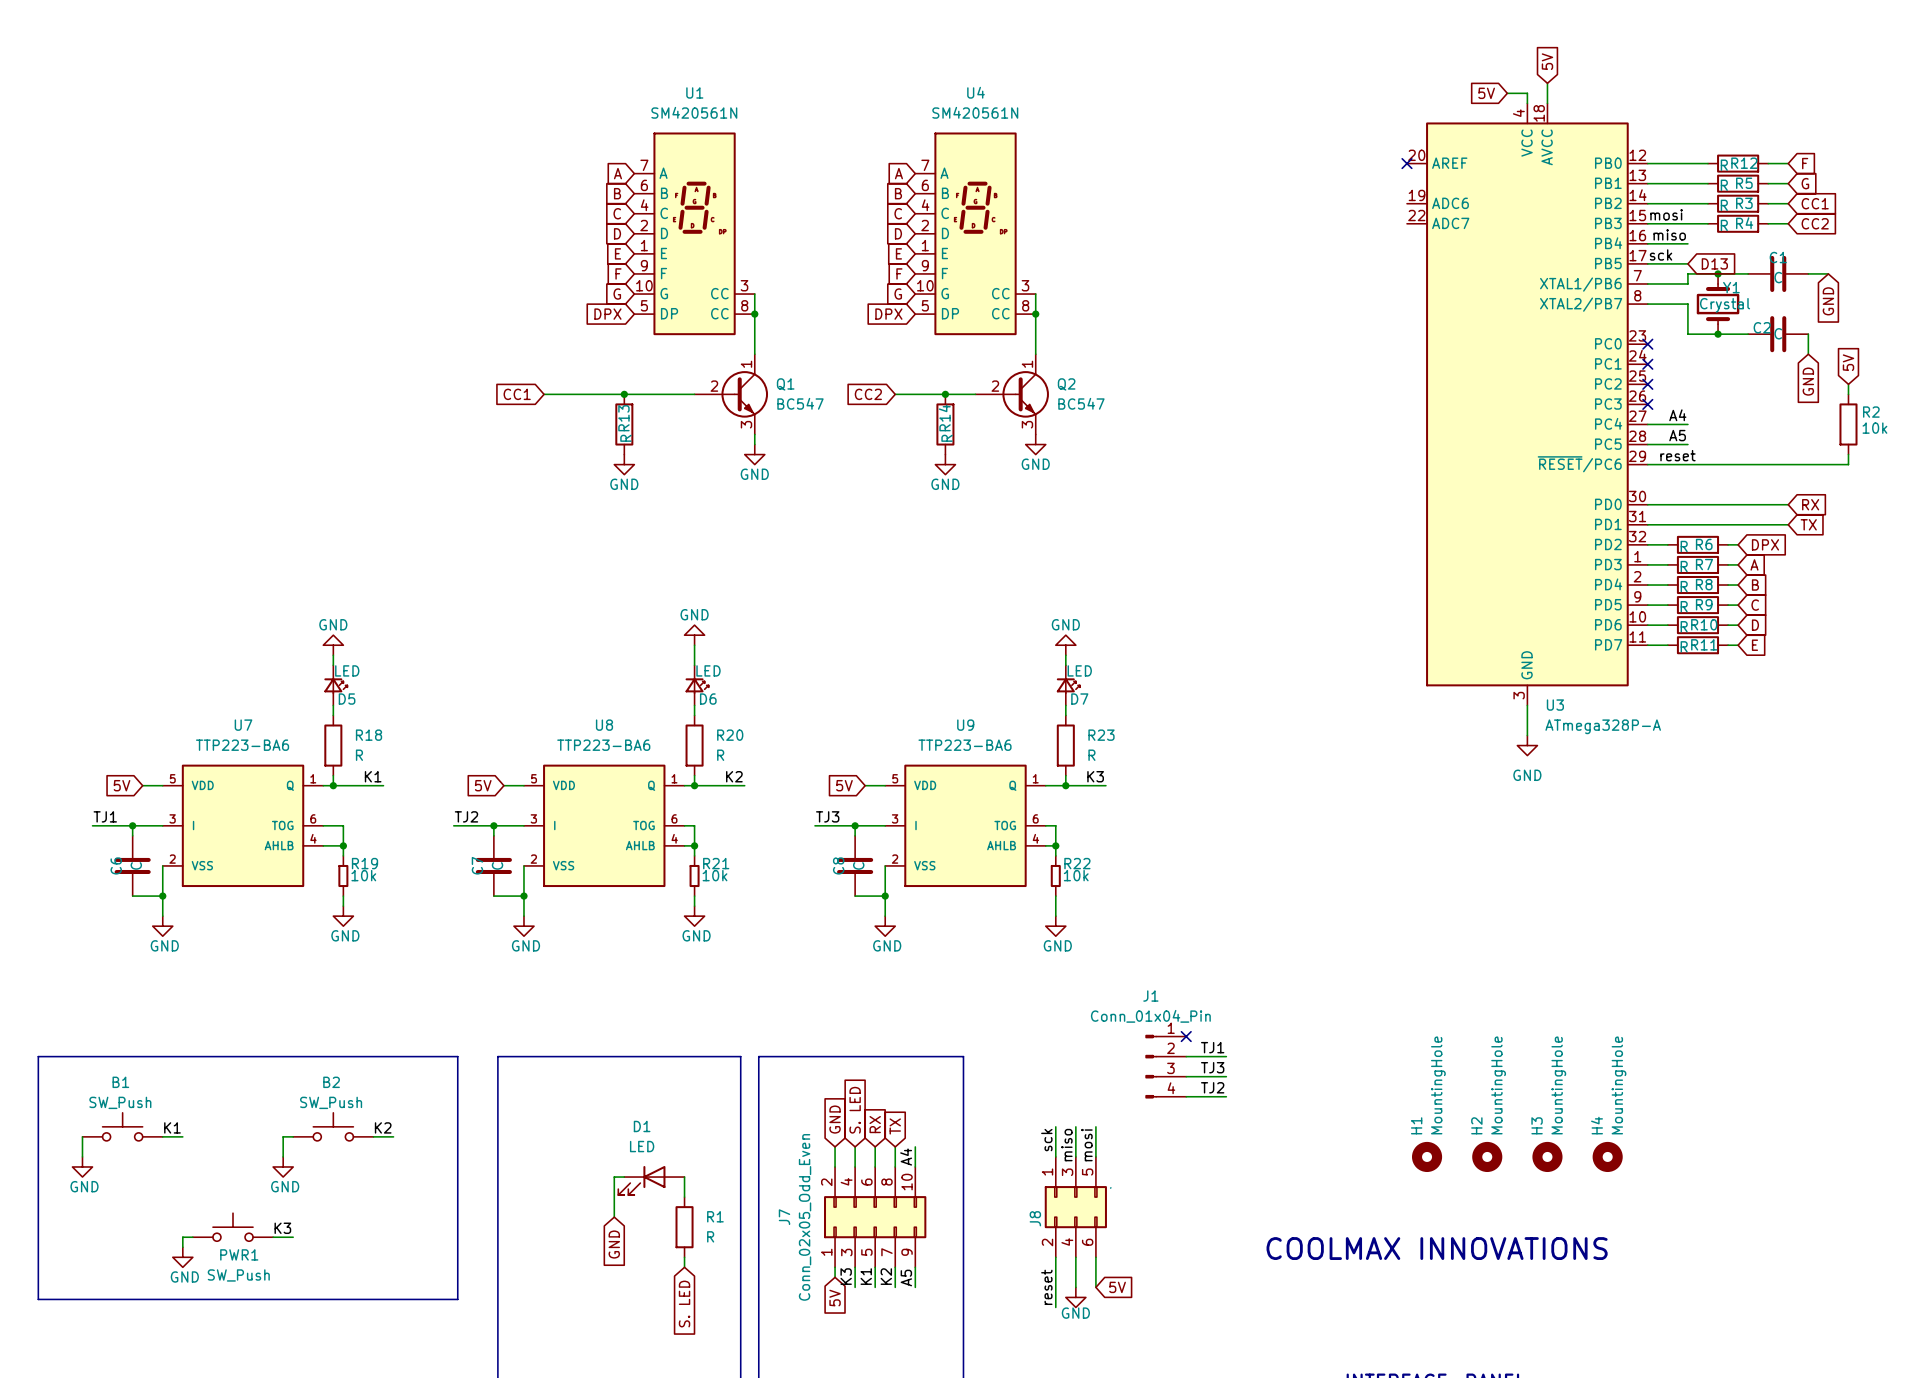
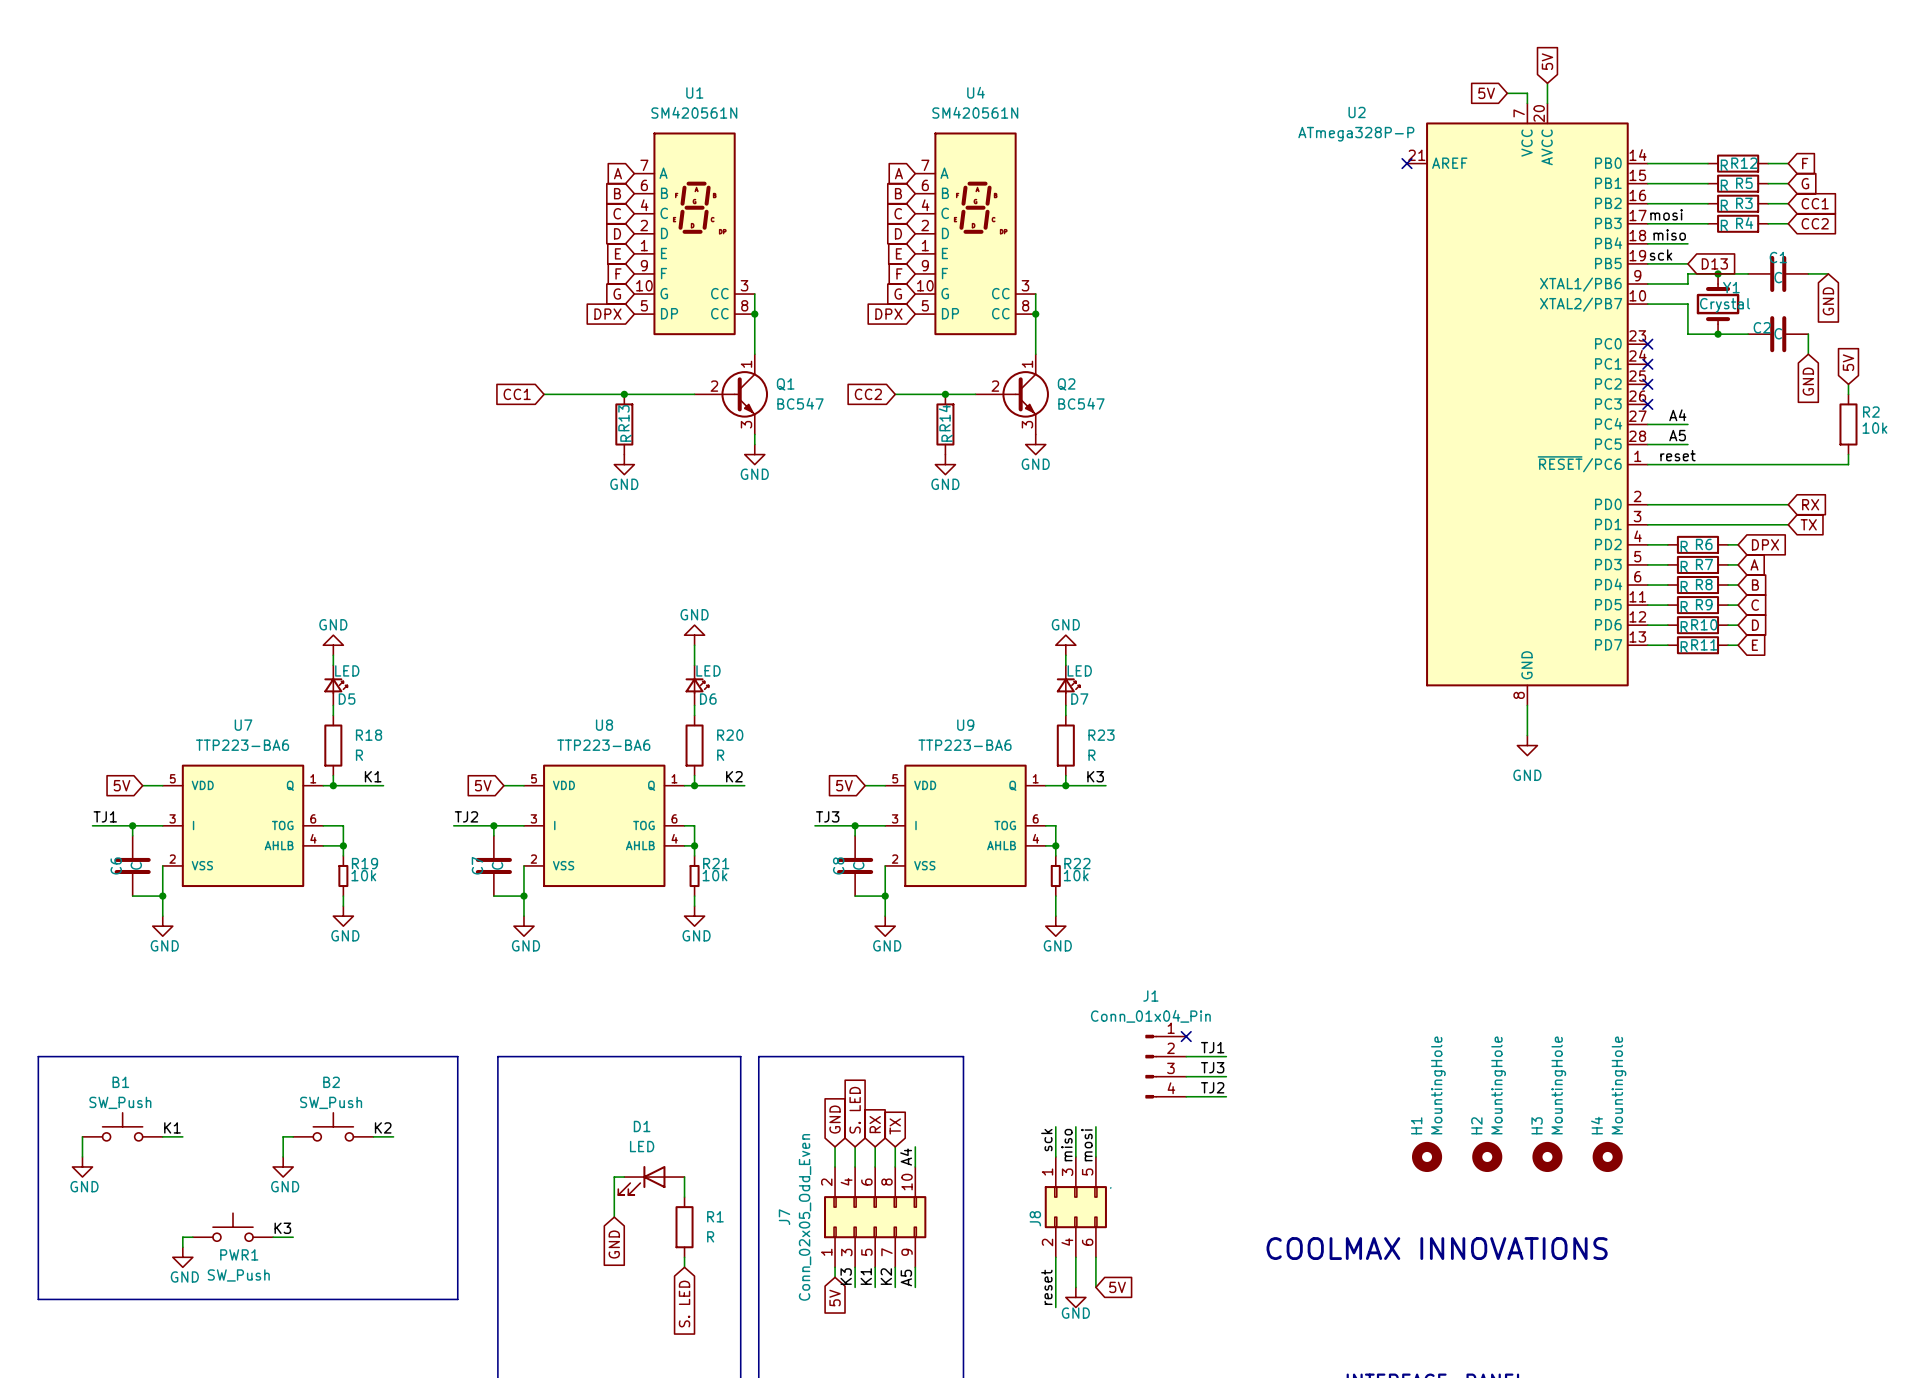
U3: ATmega328P-A (1527, 404) -> none
U2: none -> ATmega328P-P (1527, 404)

